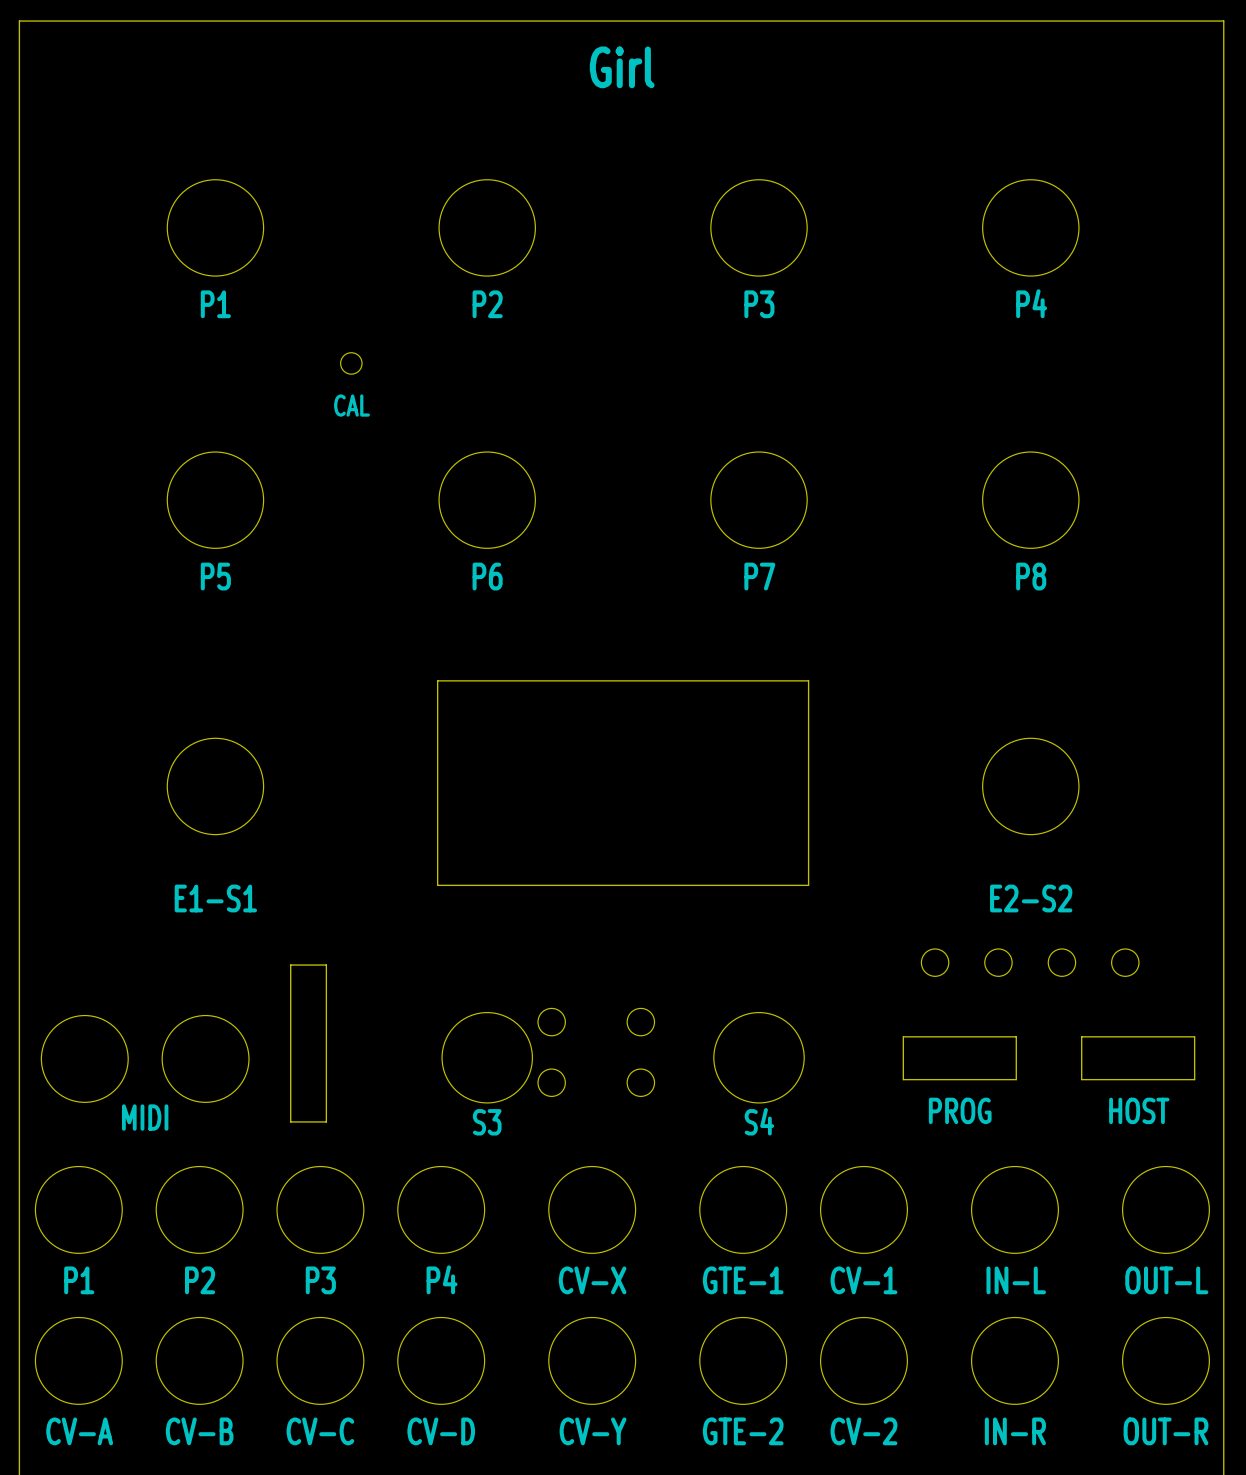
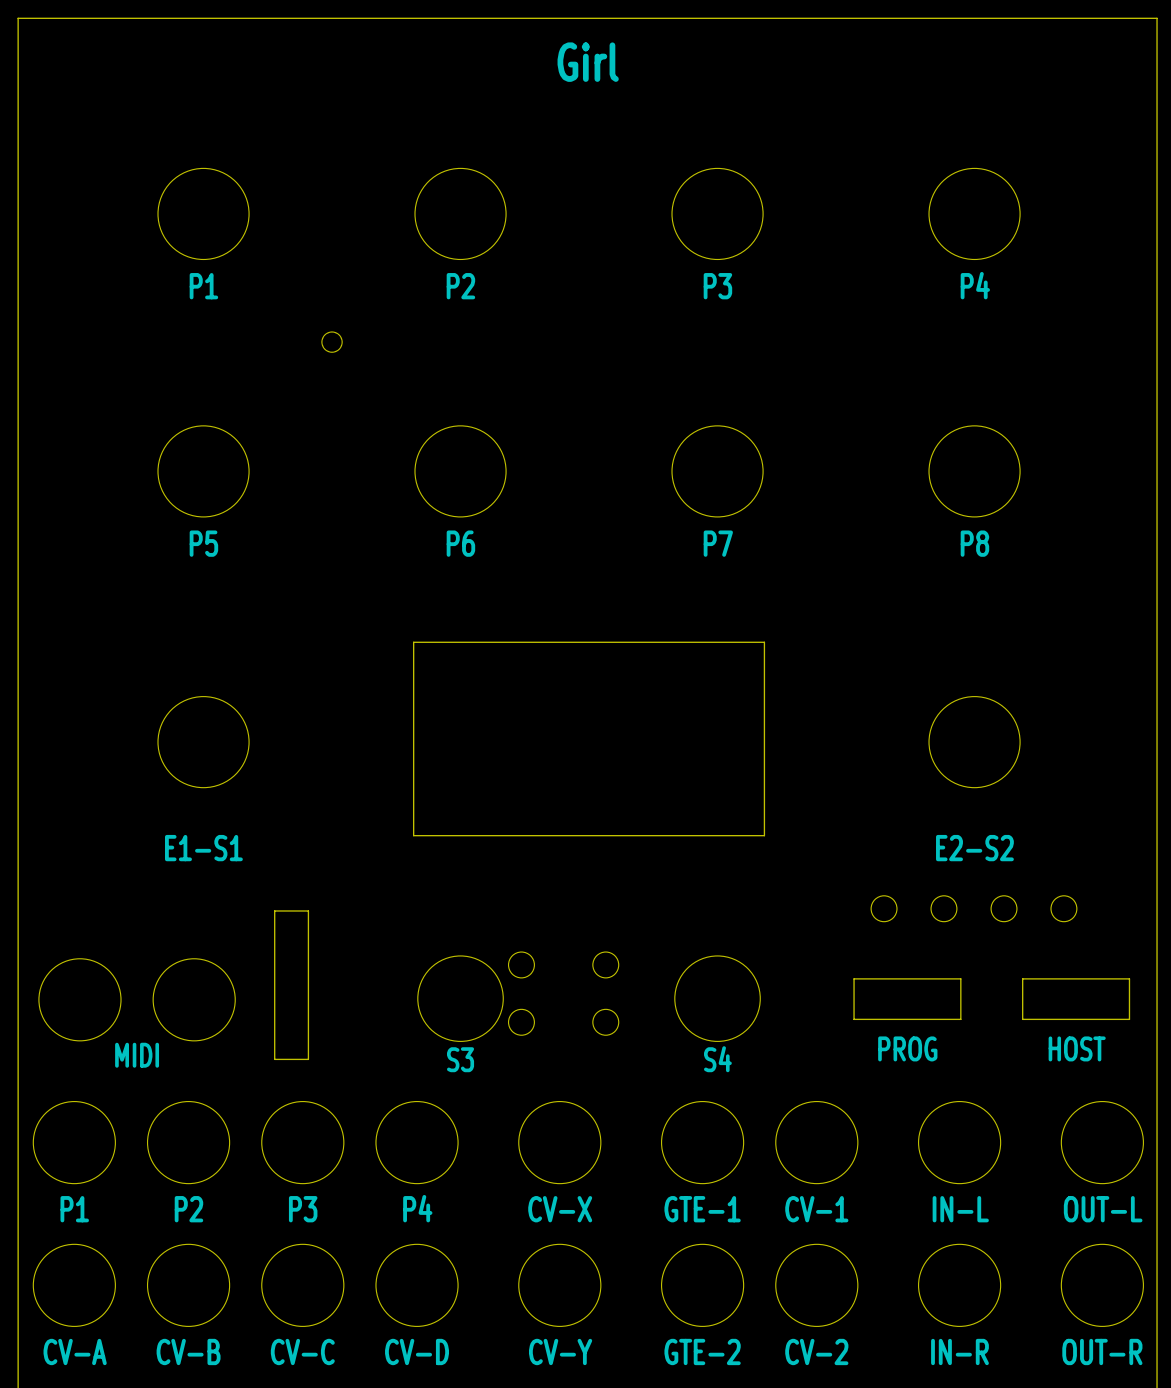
text: CAL (351, 405) -> none

